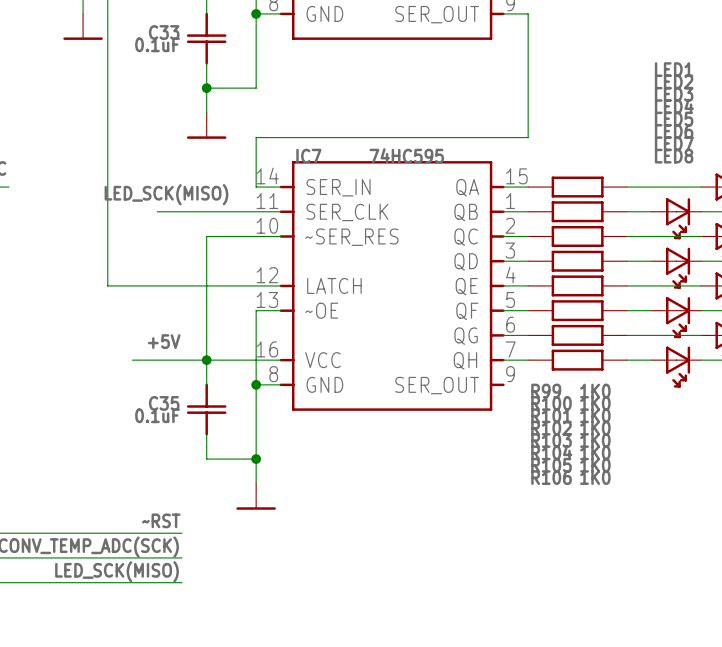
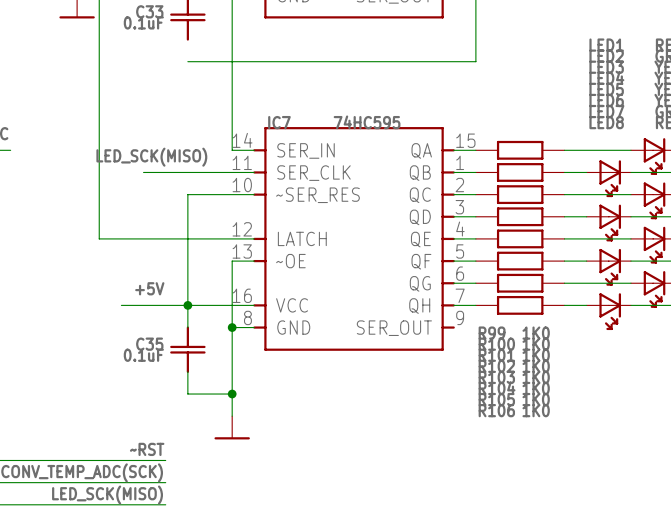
wire: (206, 63) (206, 112) -> none
junction: (206, 88) -> none
wire: (528, 88) (528, 137) (256, 137) -> (475, 61) (232, 61) (232, 106)
power symbol: (206, 125) -> none

